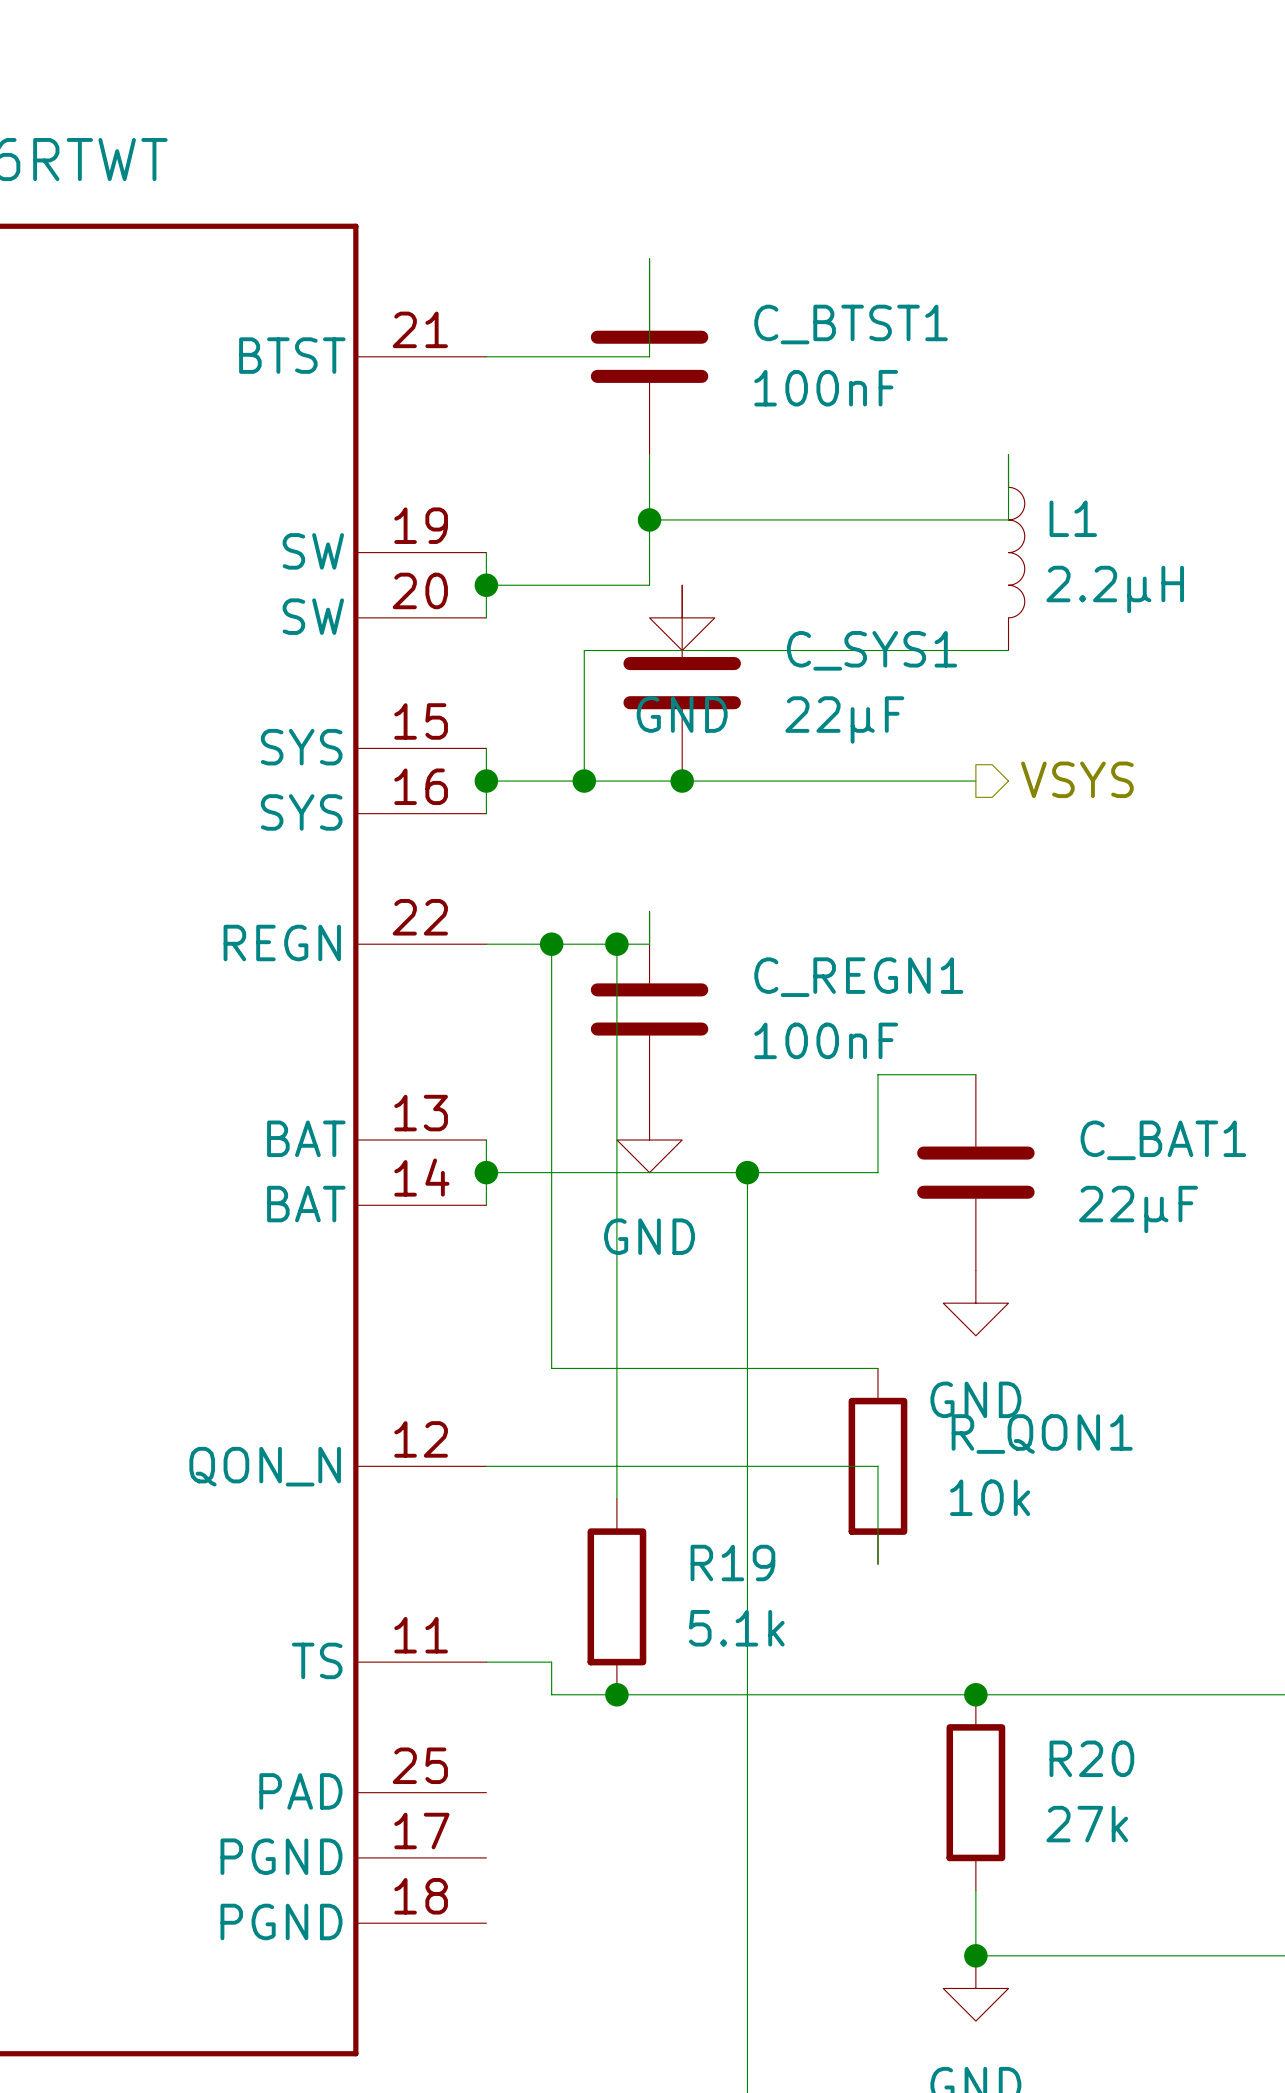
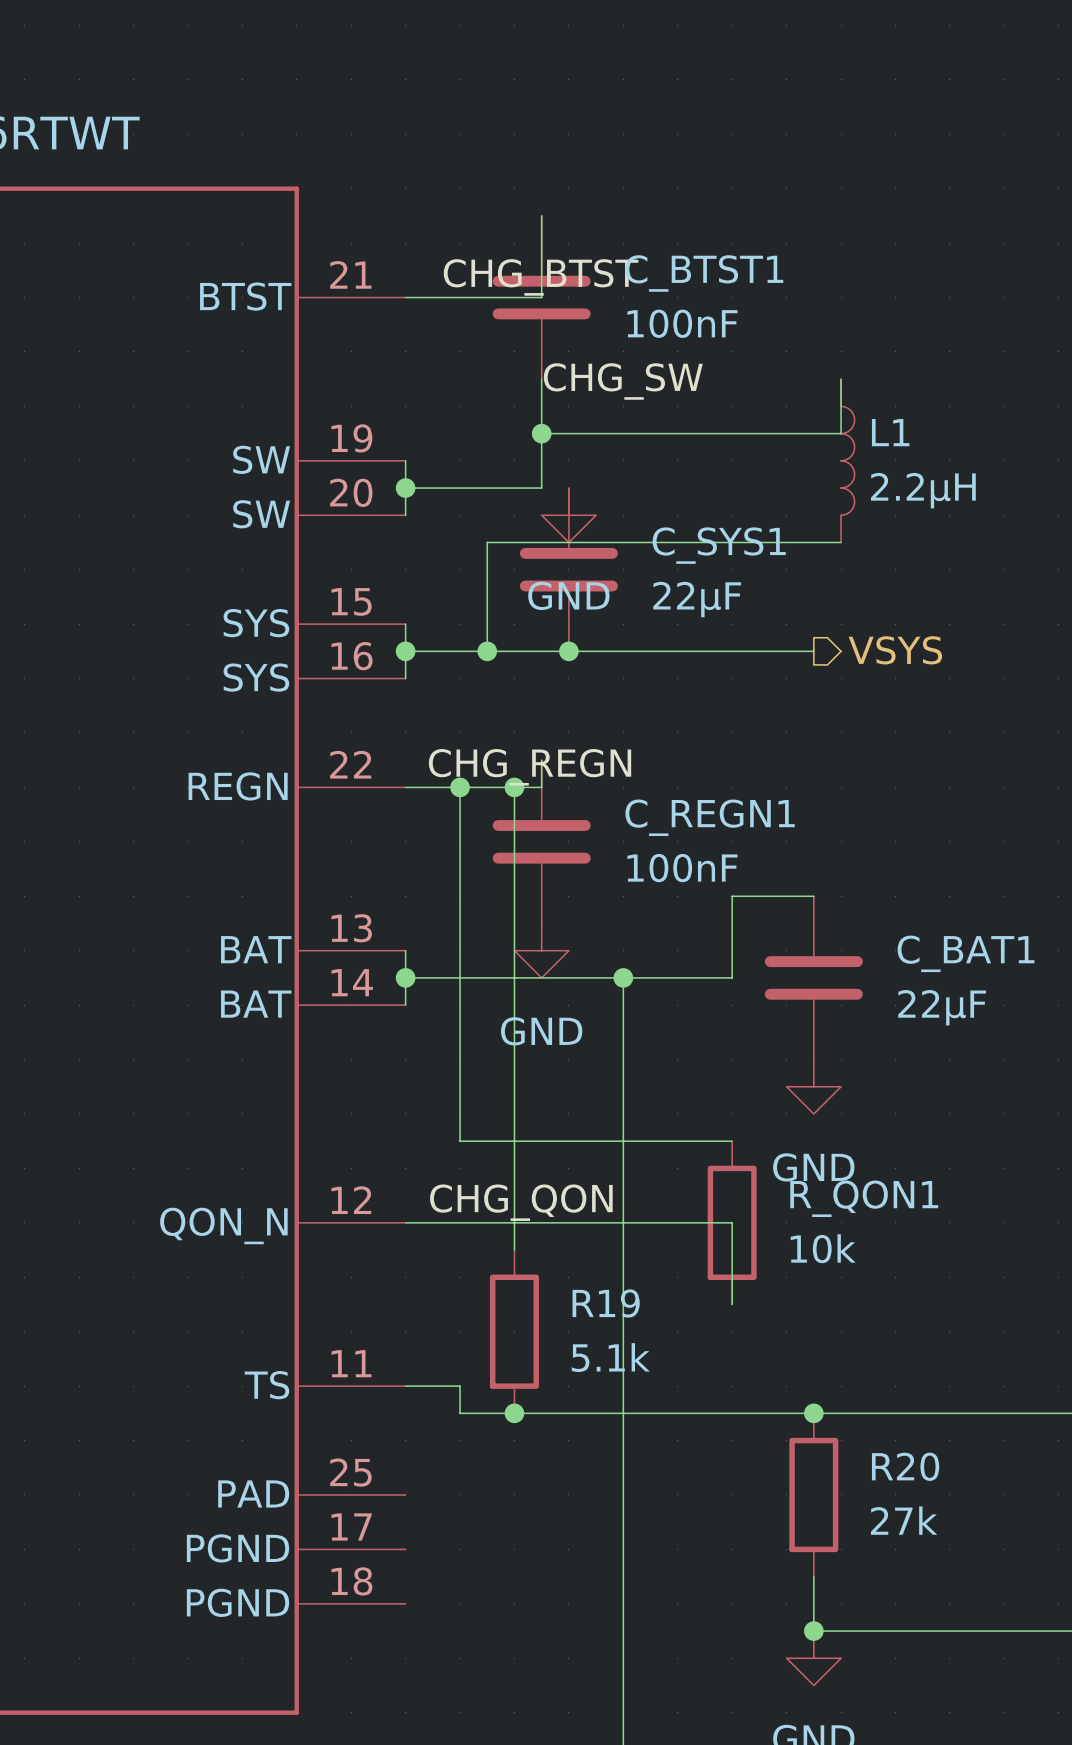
label: none -> CHG_BTST (541, 277)
label: none -> CHG_SW (623, 381)
label: none -> CHG_REGN (530, 767)
label: none -> CHG_QON (521, 1202)

